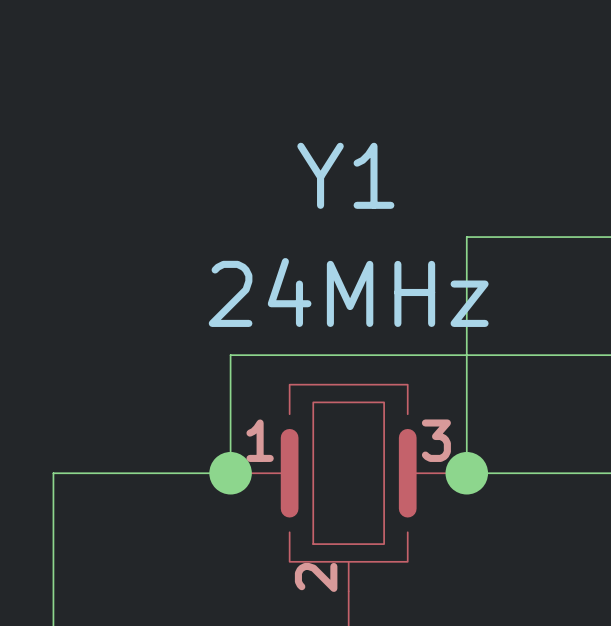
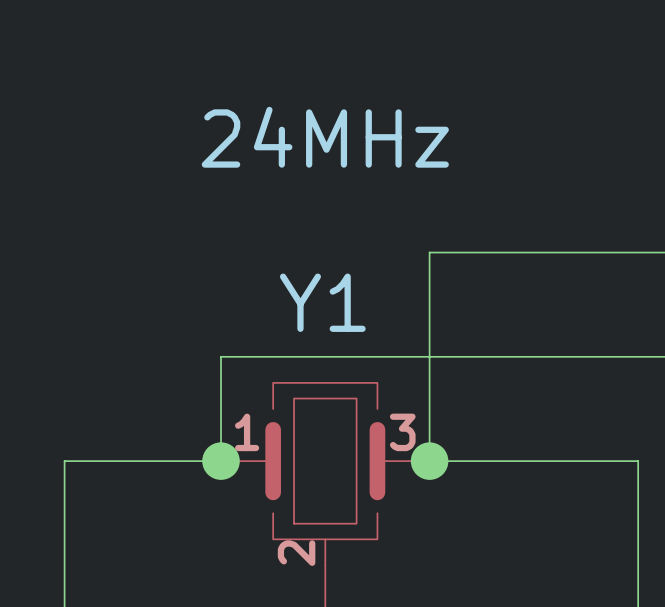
Y1 name position: Y1 (345, 175) -> Y1 (322, 302)
Y1 value position: 24MHz (348, 292) -> 24MHz (325, 137)

